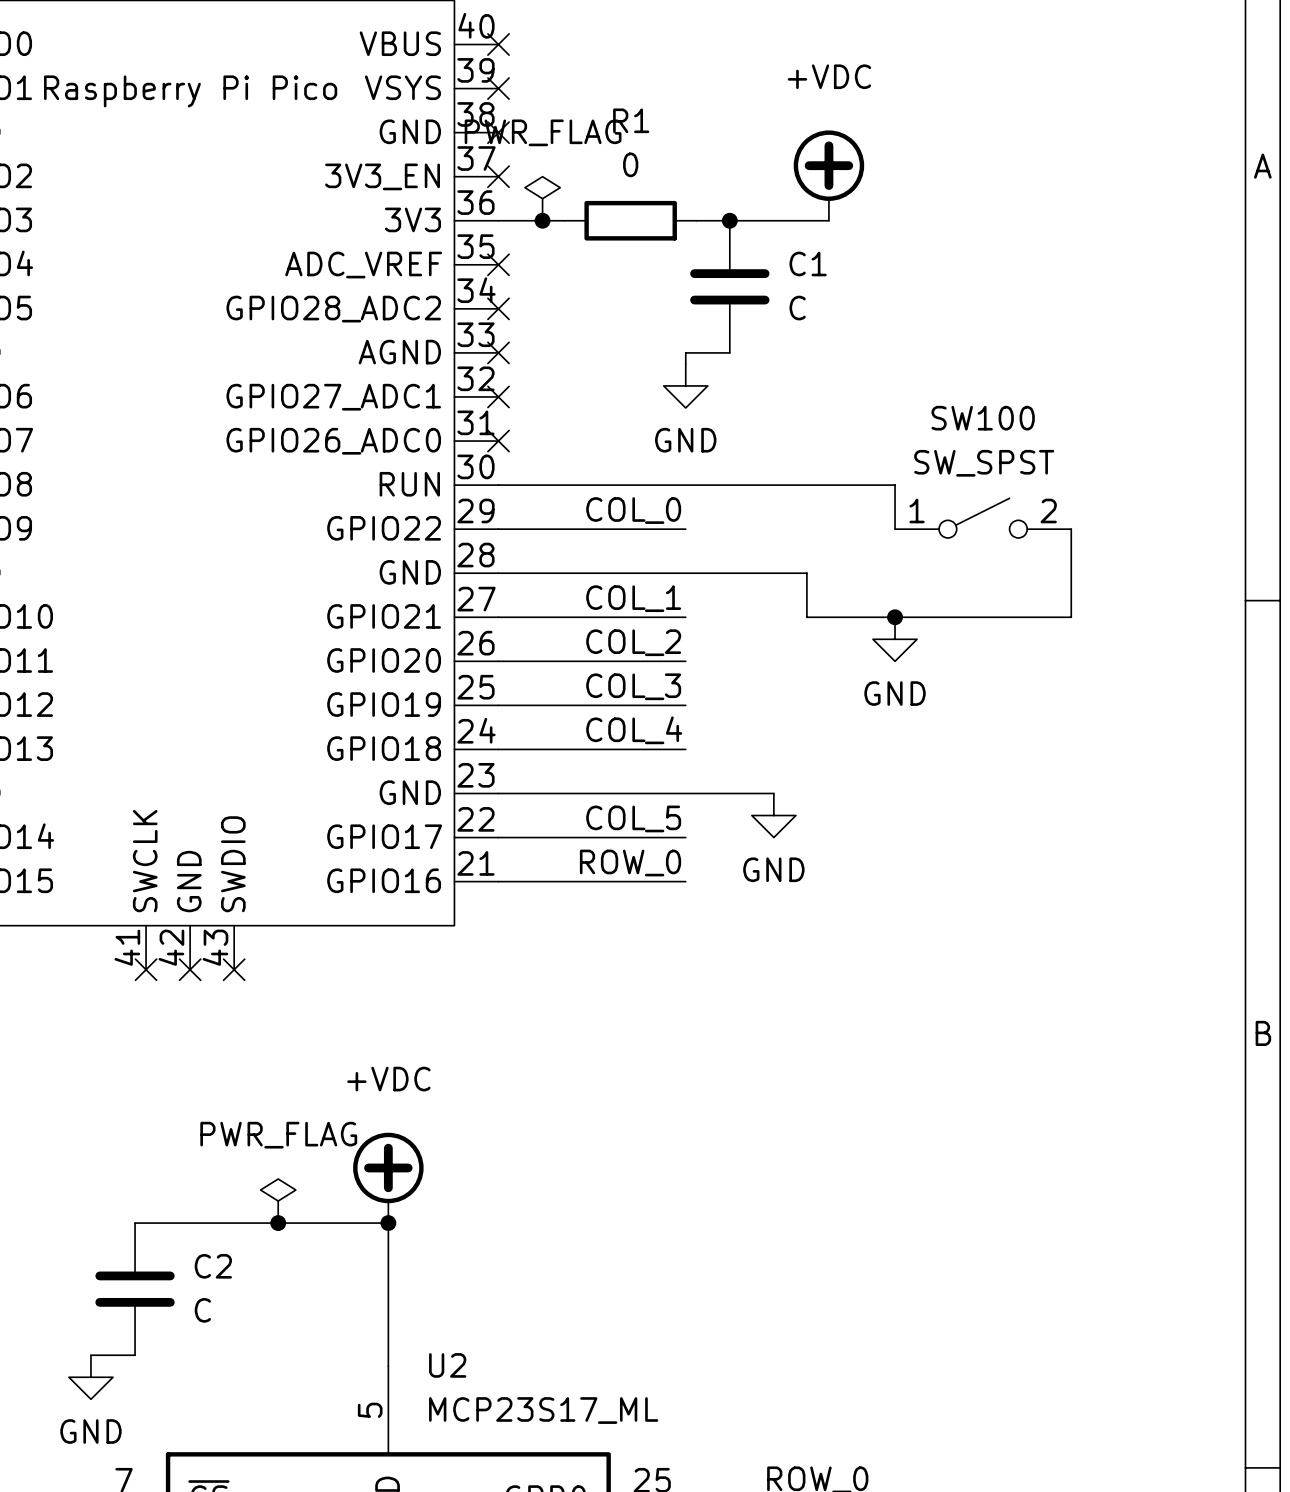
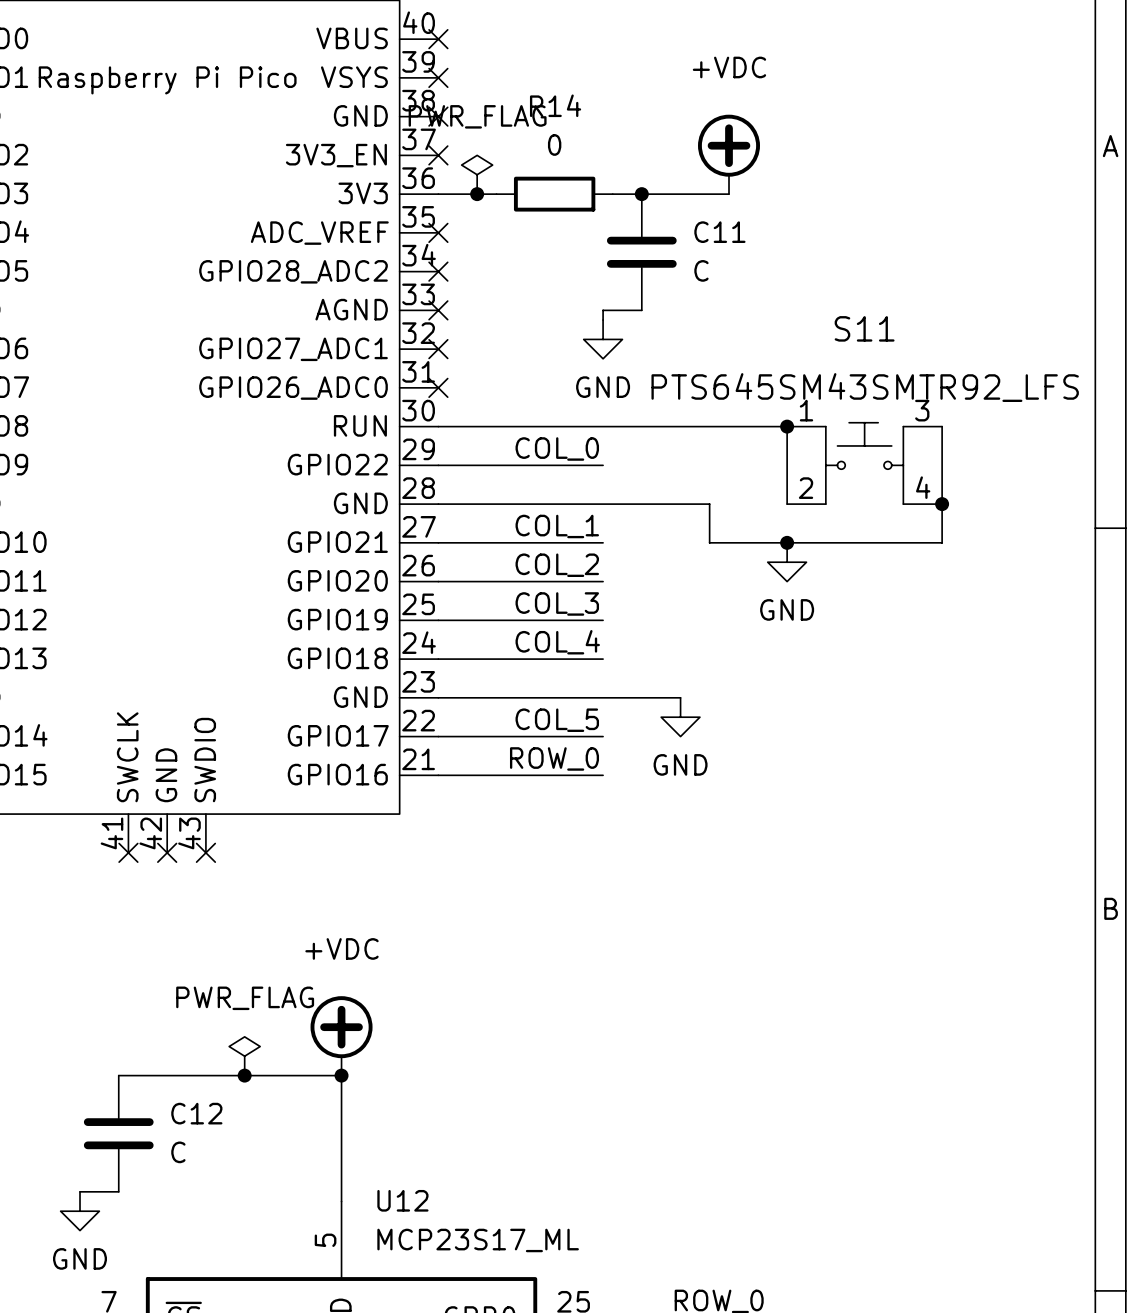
R1 name: R1 (631, 120) -> R14 (555, 105)
C1 name: C1 (808, 263) -> C11 (719, 232)
junction: none -> (787, 426)
wire: none -> (942, 426) (942, 465)
SW100: SW_SPST (983, 518) -> none
S11: none -> PTS645SM43SMTR92_LFS (864, 463)
wire: none -> (787, 465) (787, 504)
junction: none -> (942, 504)
C2 name: C2 (213, 1266) -> C12 (196, 1113)
U2 name: U2 (447, 1365) -> U12 (402, 1200)

